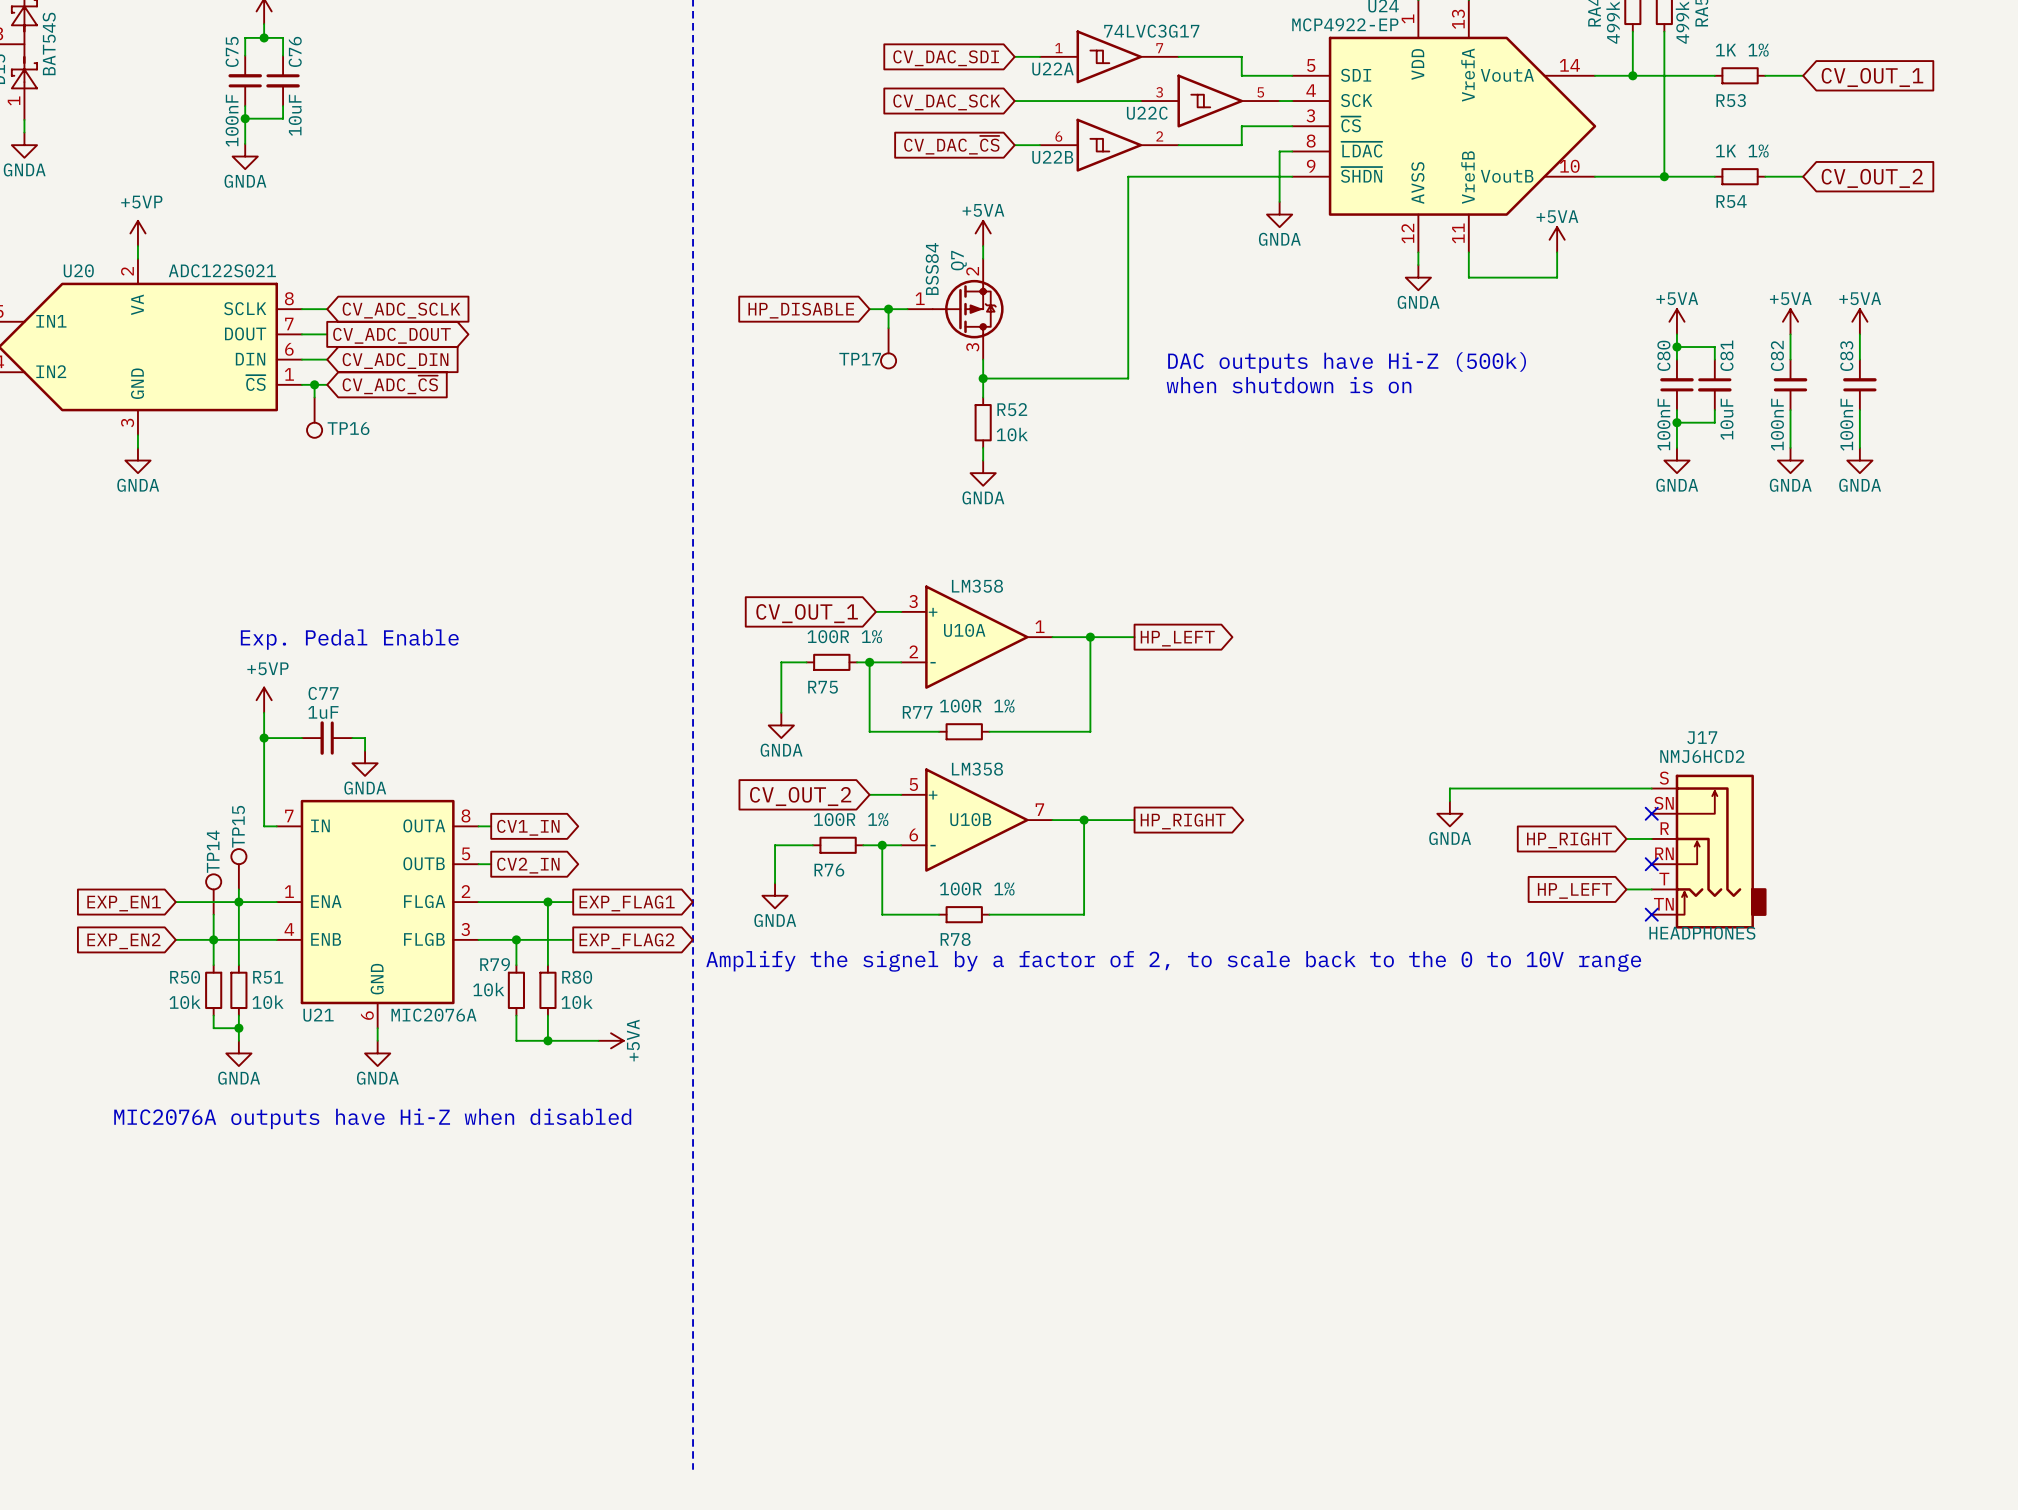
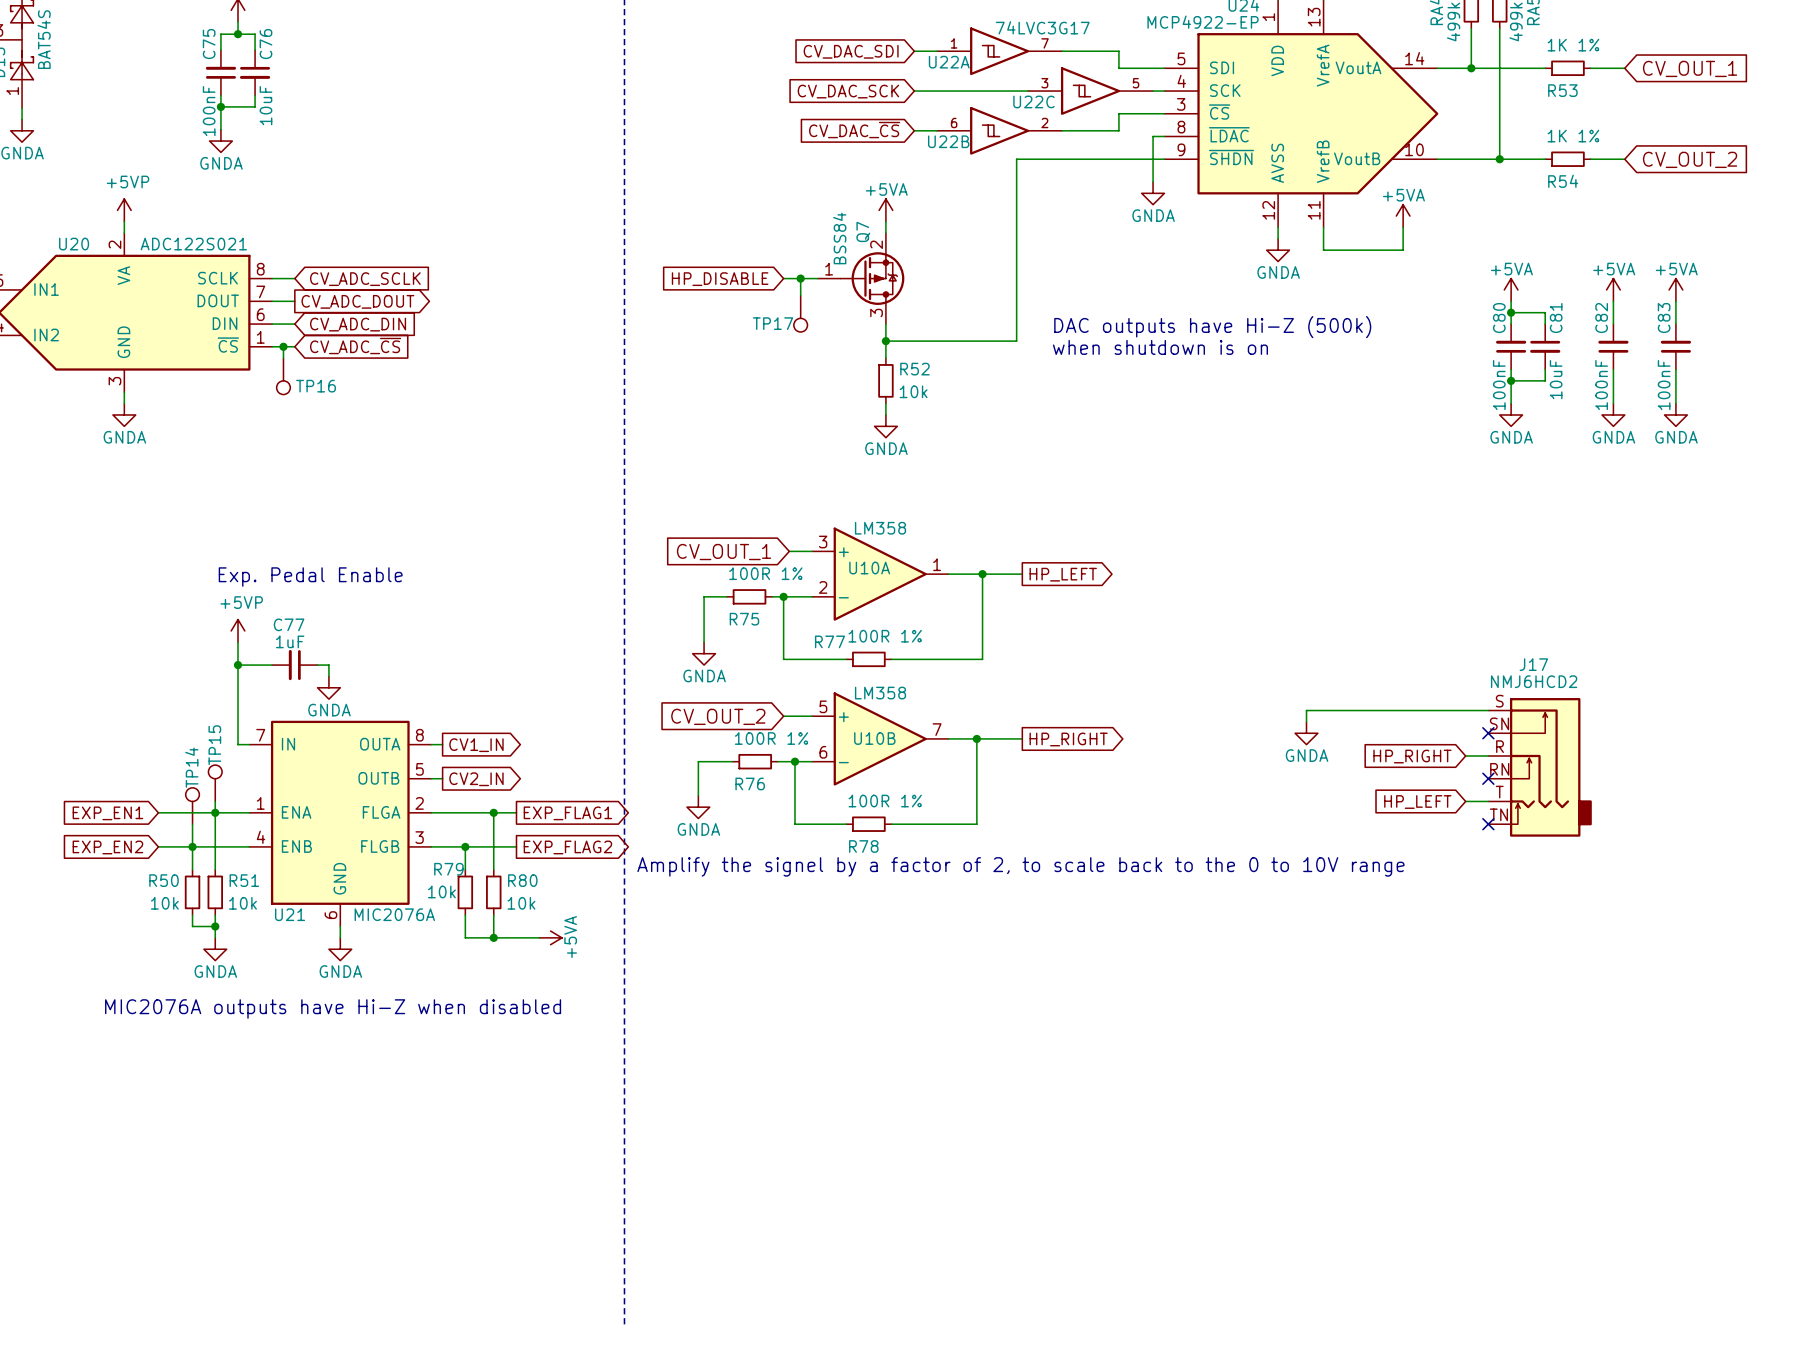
J17 text: HEADPHONES (1702, 933) -> none

